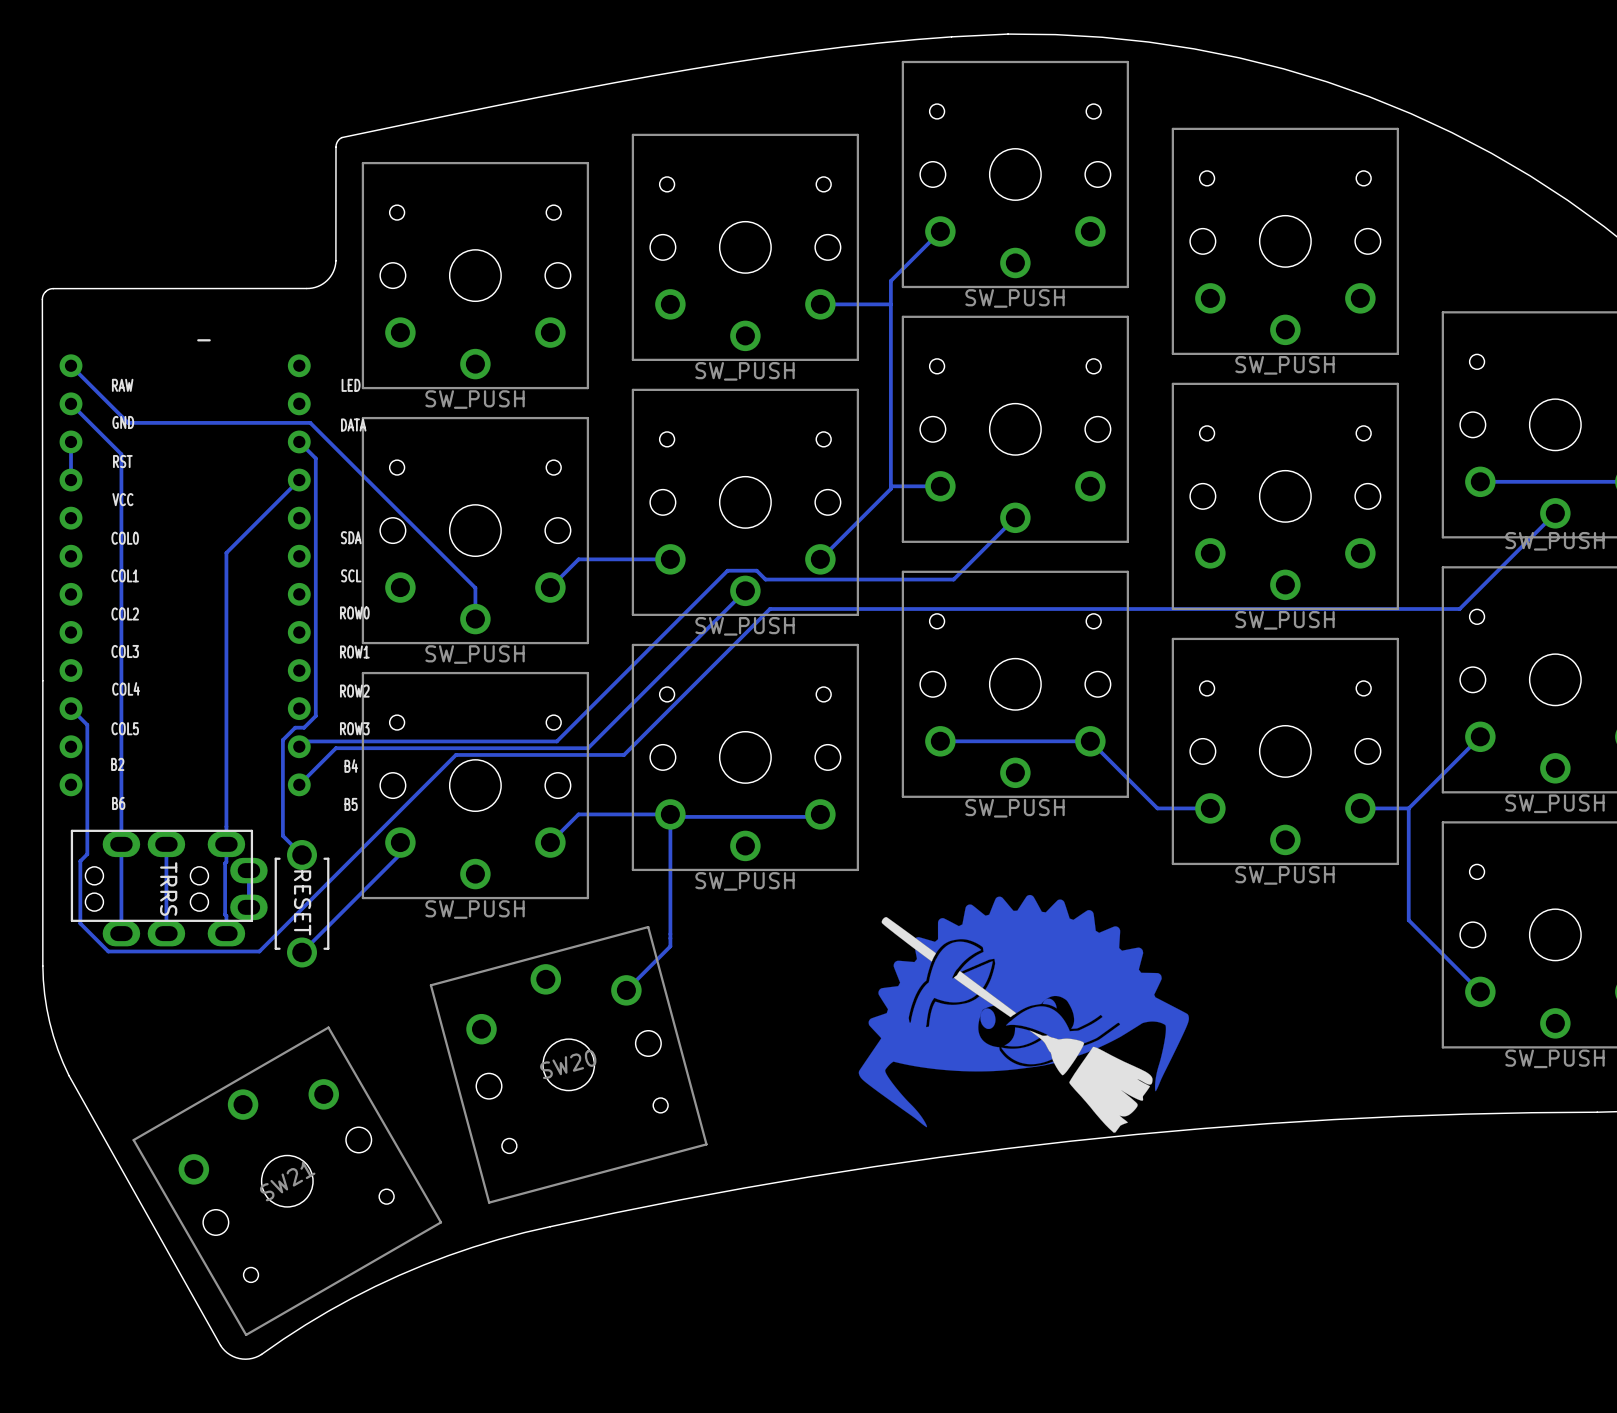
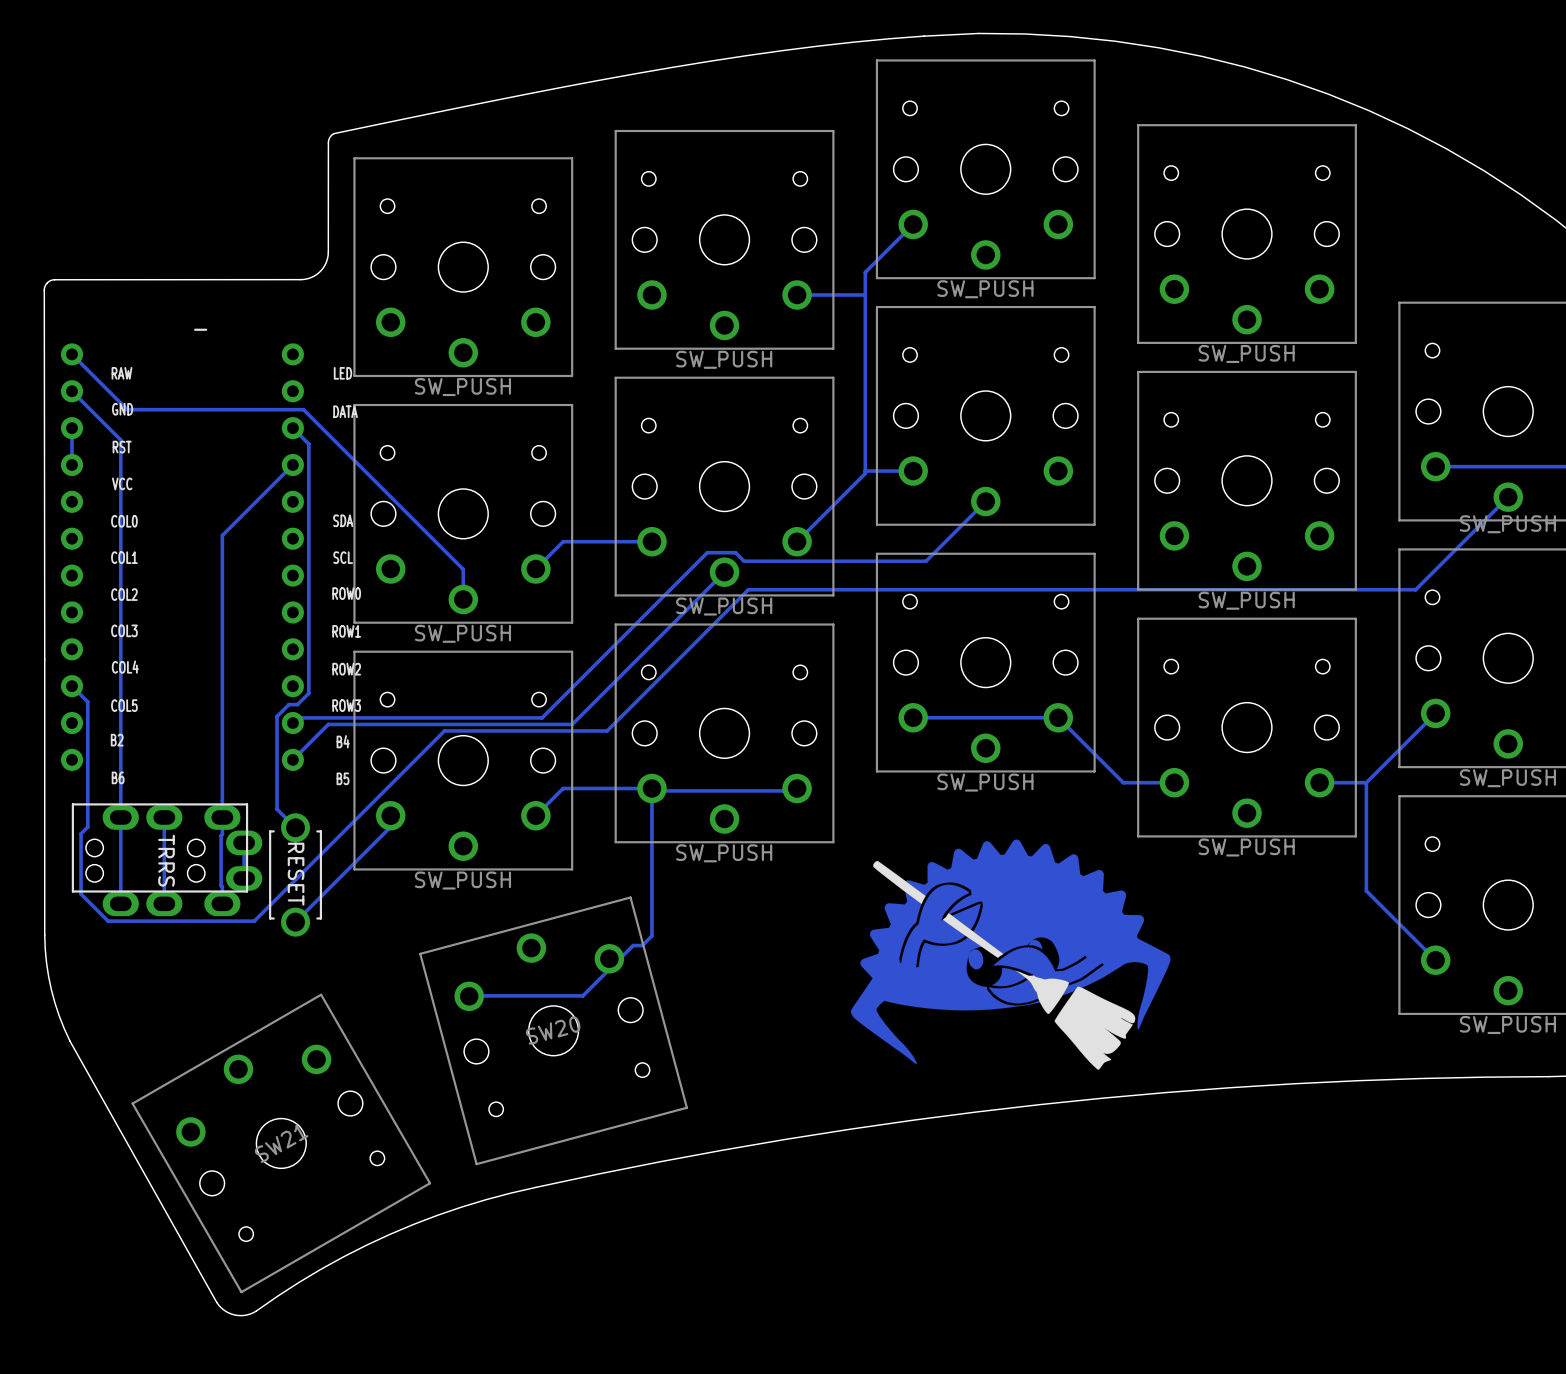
track: (670, 946) (626, 990) -> (651, 916) (651, 935) (642, 945) (633, 945) (582, 995) (480, 995)
drawing position: (1023, 1013) -> (1010, 954)

